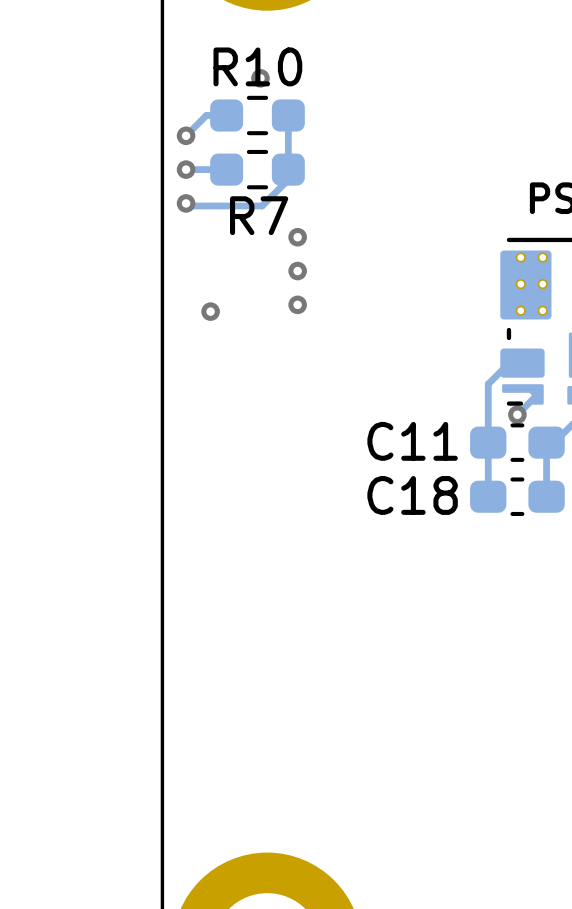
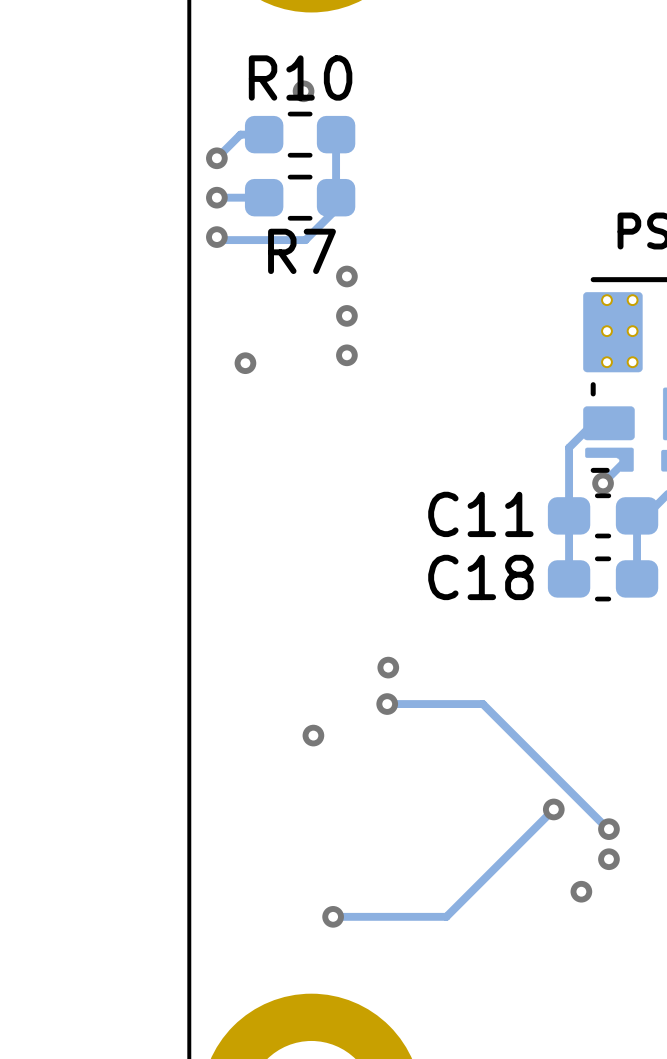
via: none -> (388, 667)
track: none -> (387, 704) (482, 704) (608, 829)
via: none -> (387, 704)
via: none -> (313, 735)
track: none -> (553, 809) (446, 916) (333, 916)
via: none -> (553, 809)
via: none -> (608, 829)
via: none -> (608, 859)
via: none -> (581, 891)
via: none -> (333, 916)

